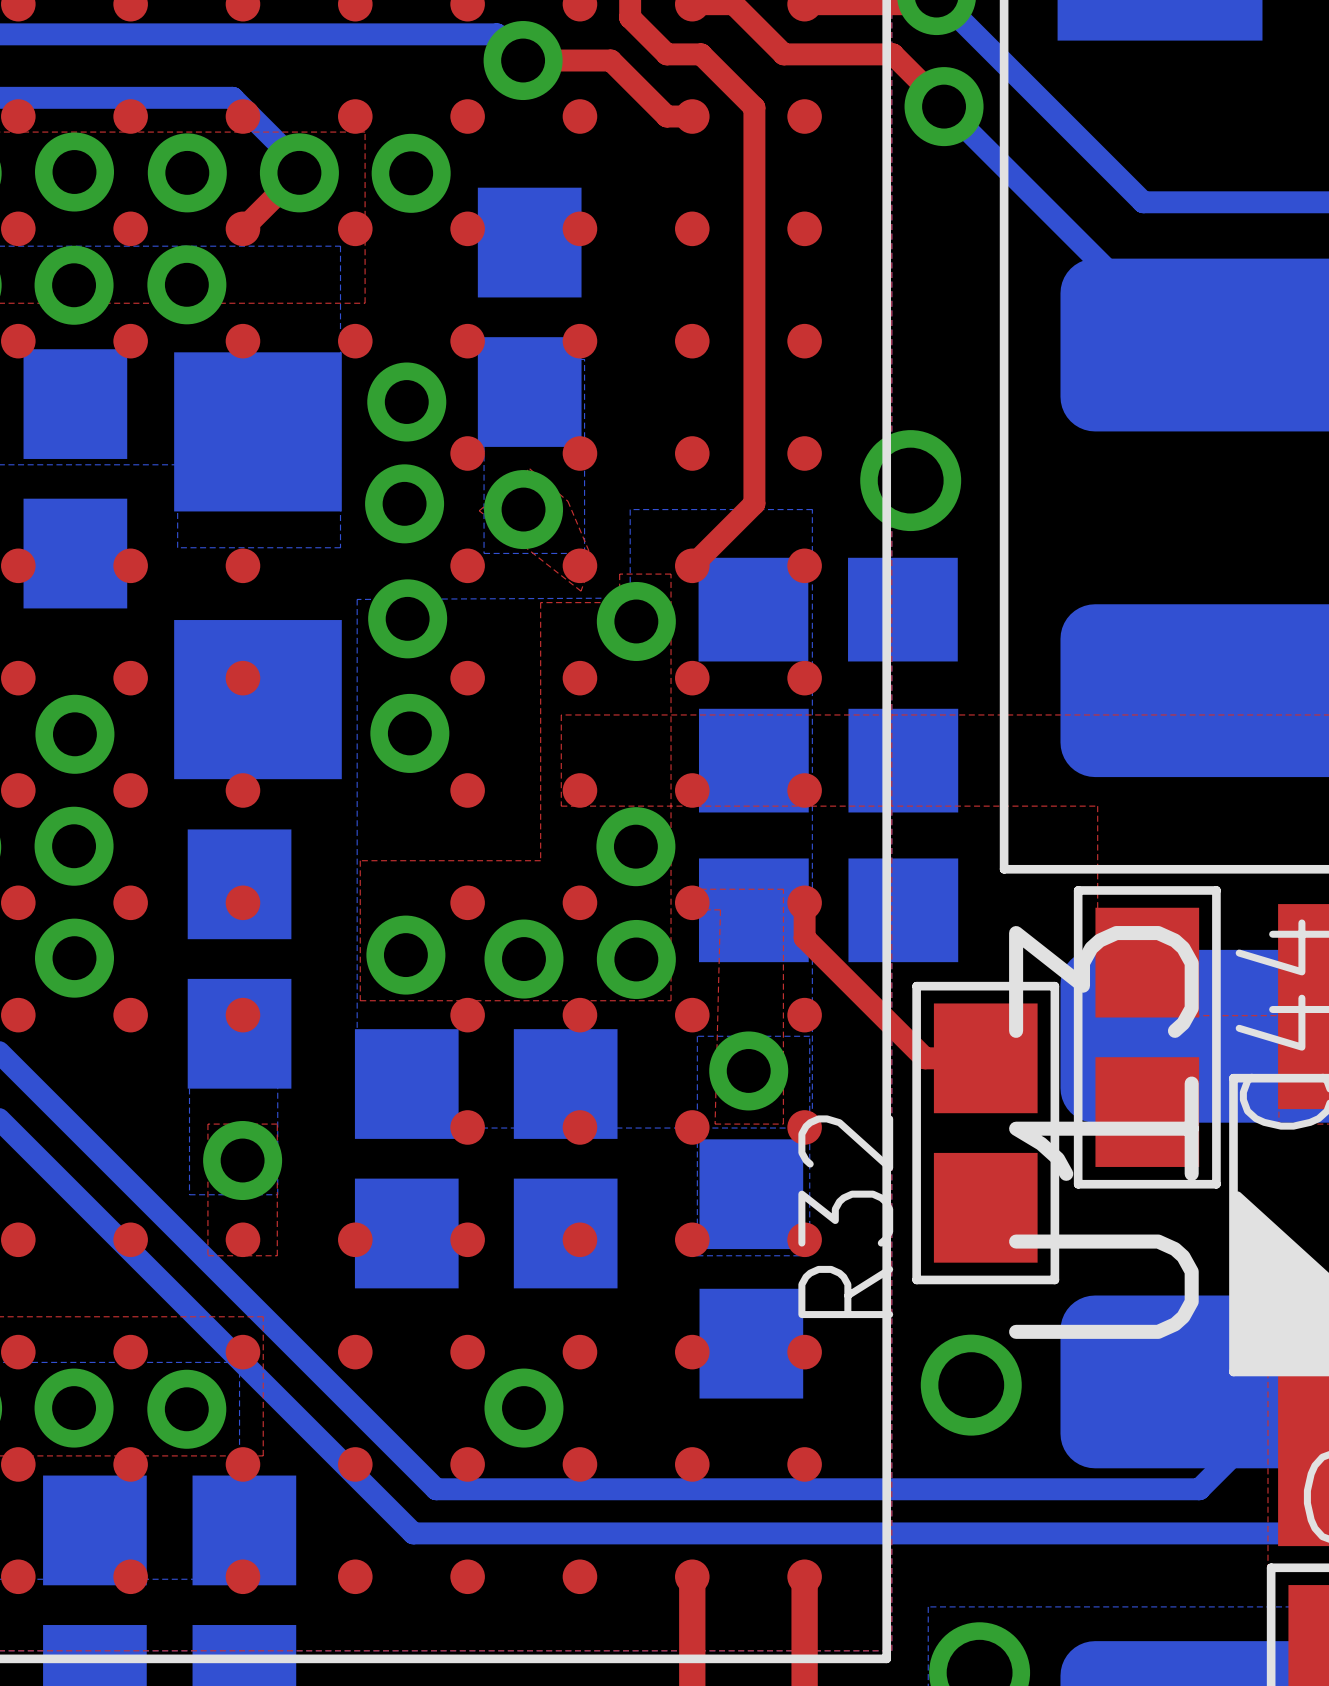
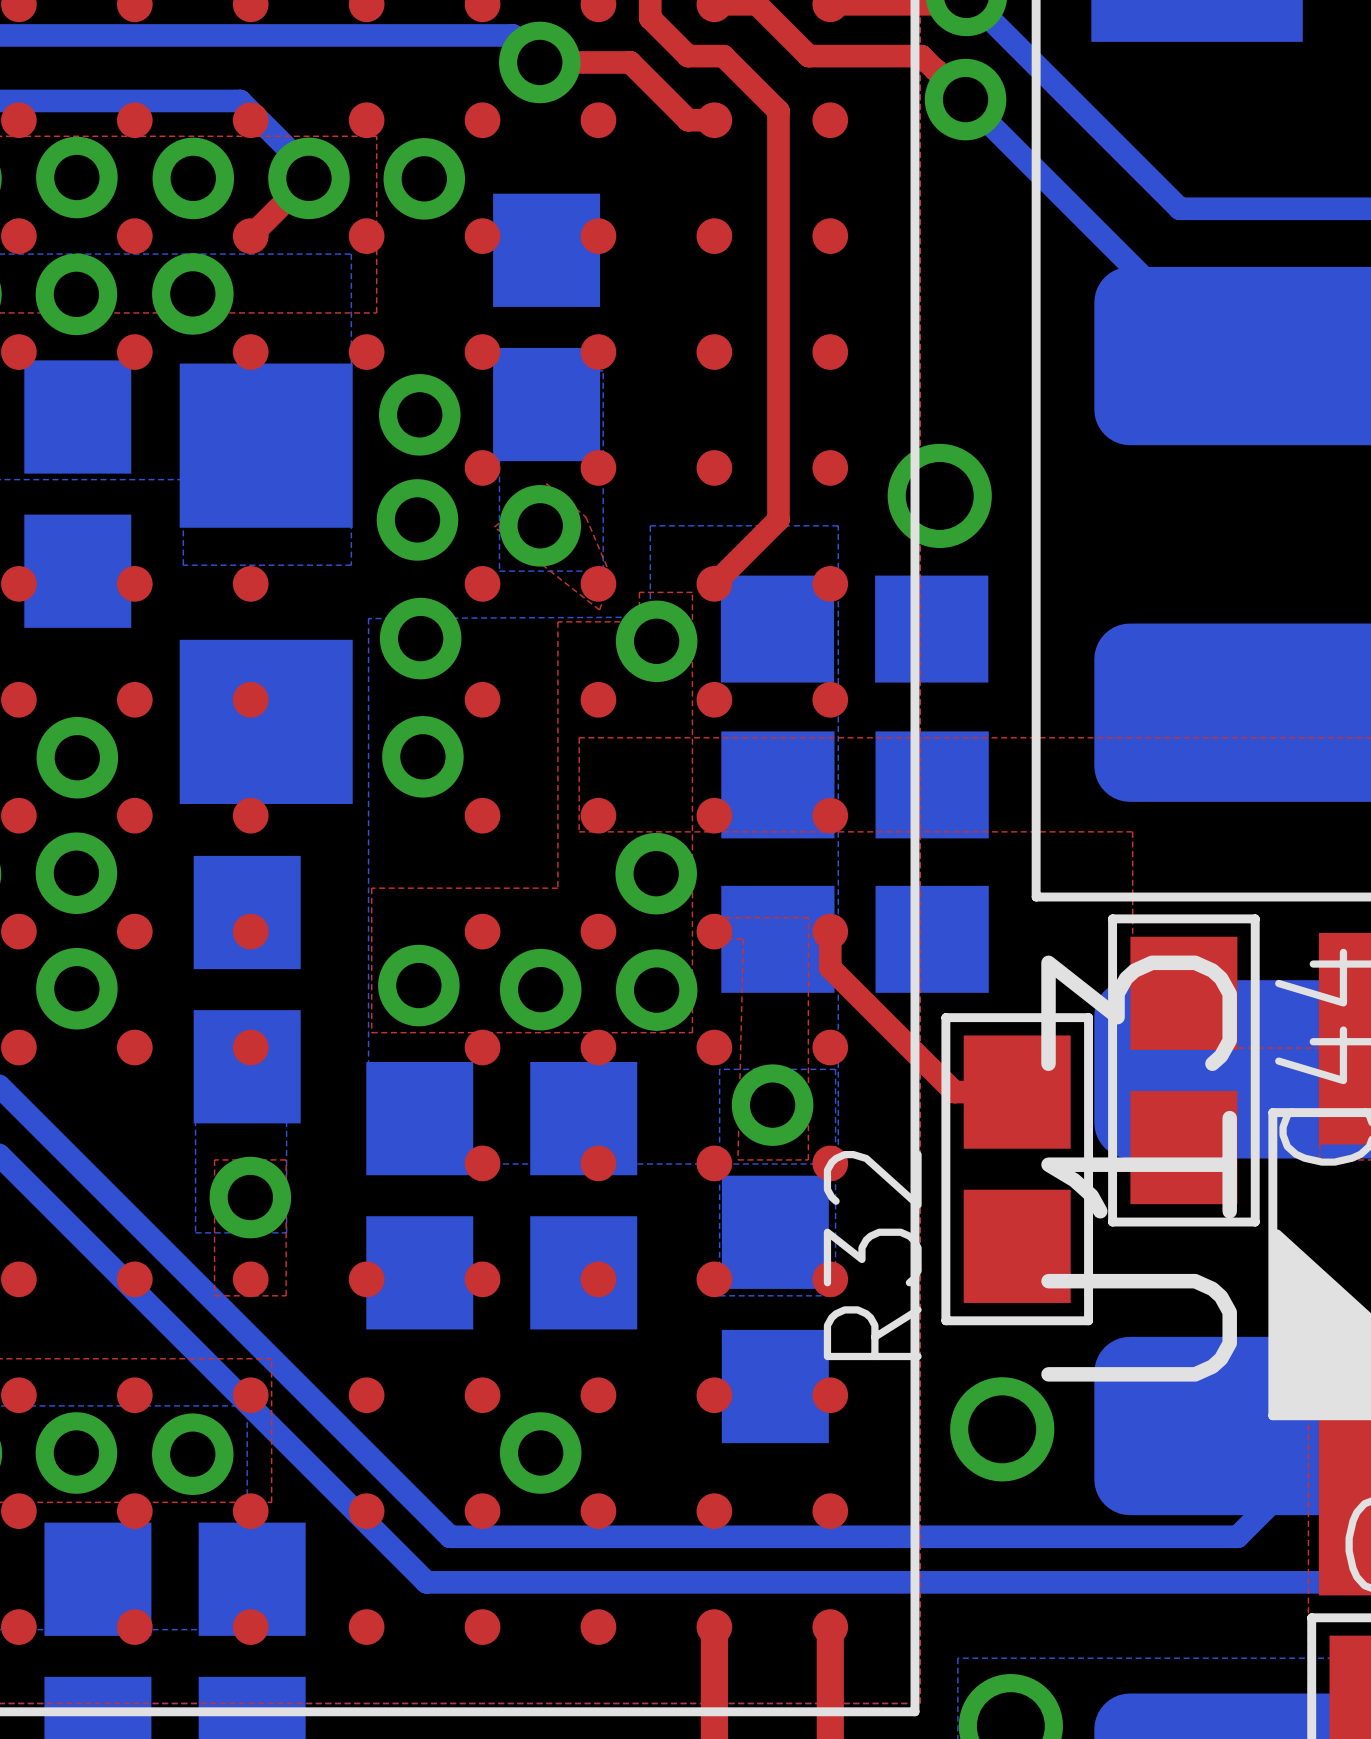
via position: (944, 106) -> (965, 99)

